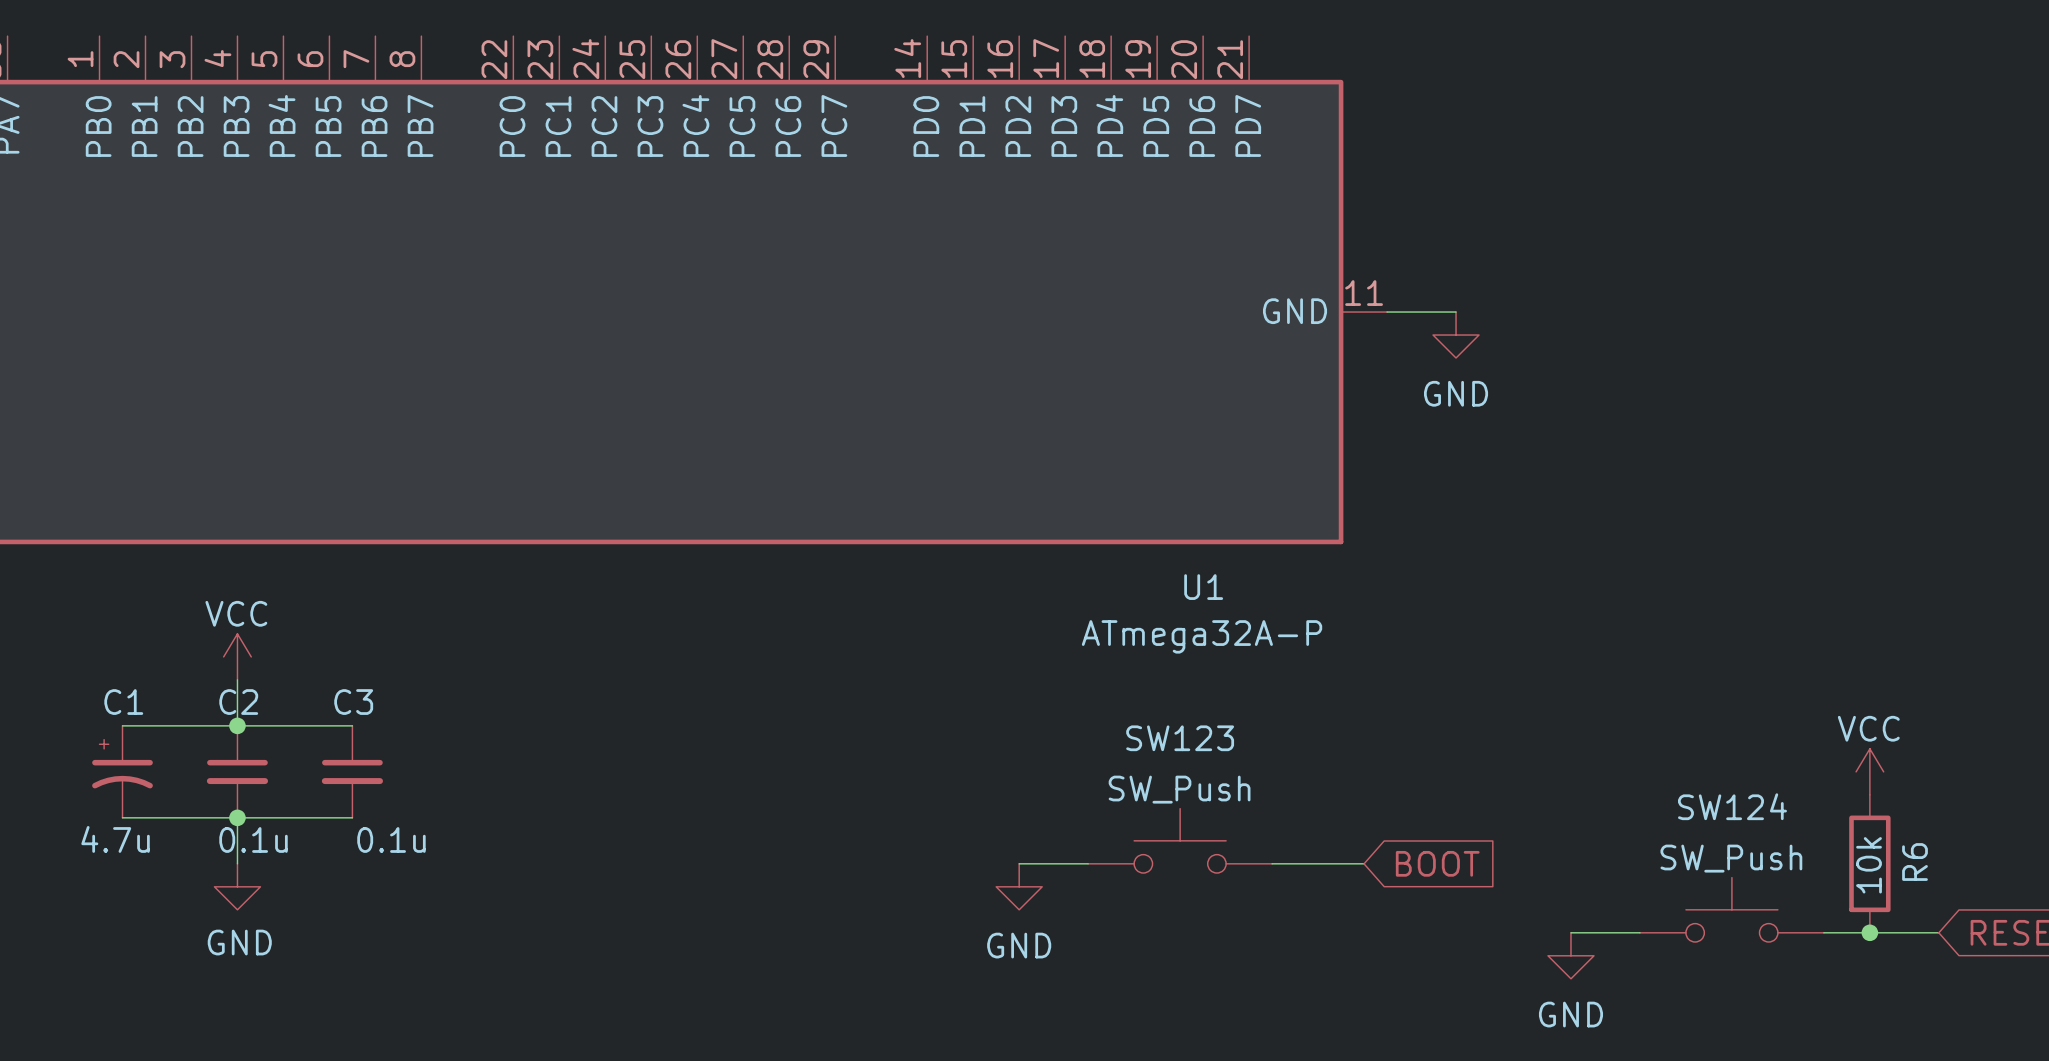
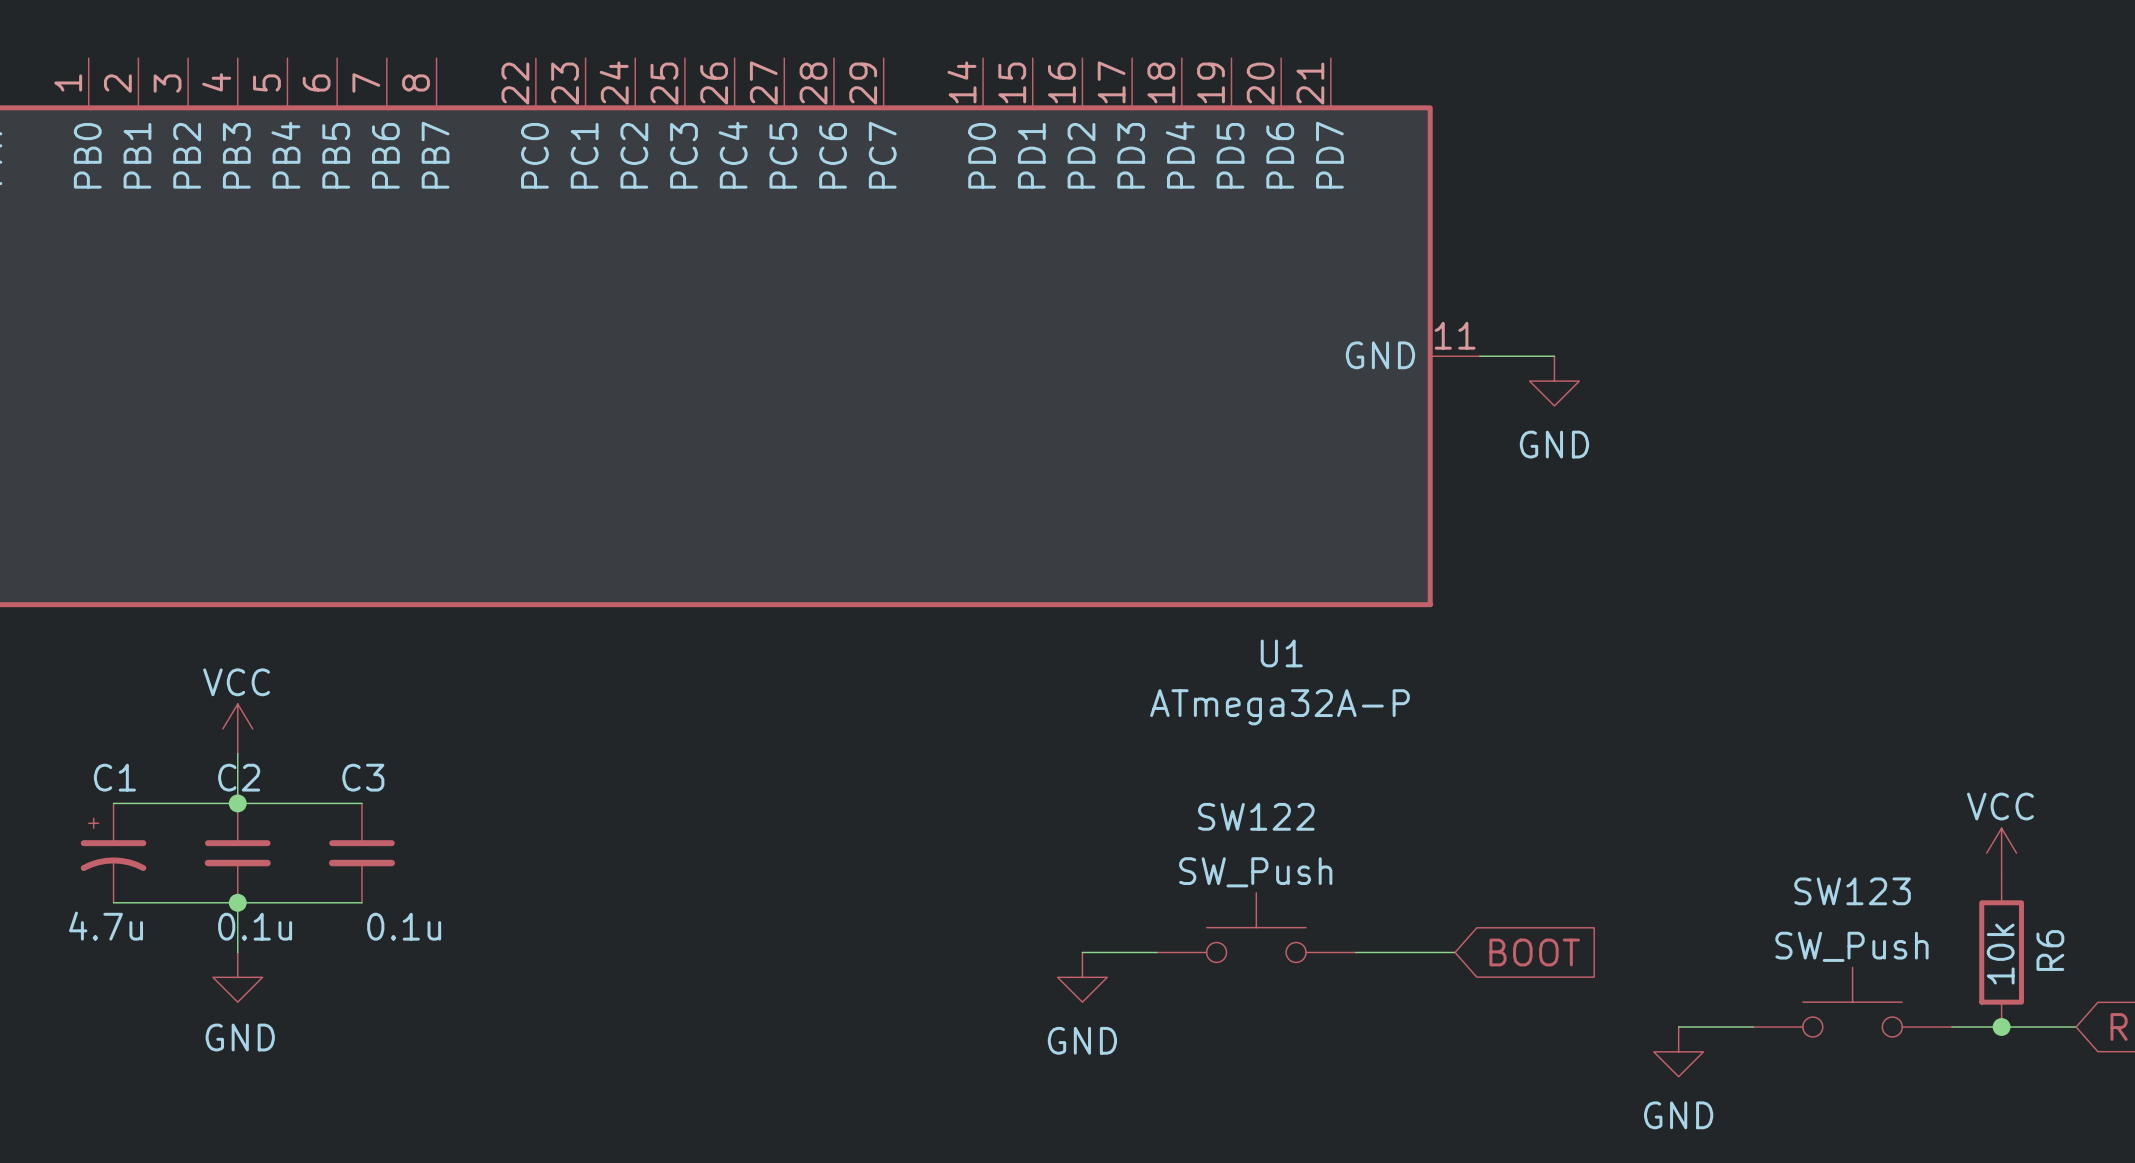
SW123 name: SW123 (1180, 738) -> SW122 (1256, 816)
SW124 name: SW124 (1732, 806) -> SW123 (1852, 891)

